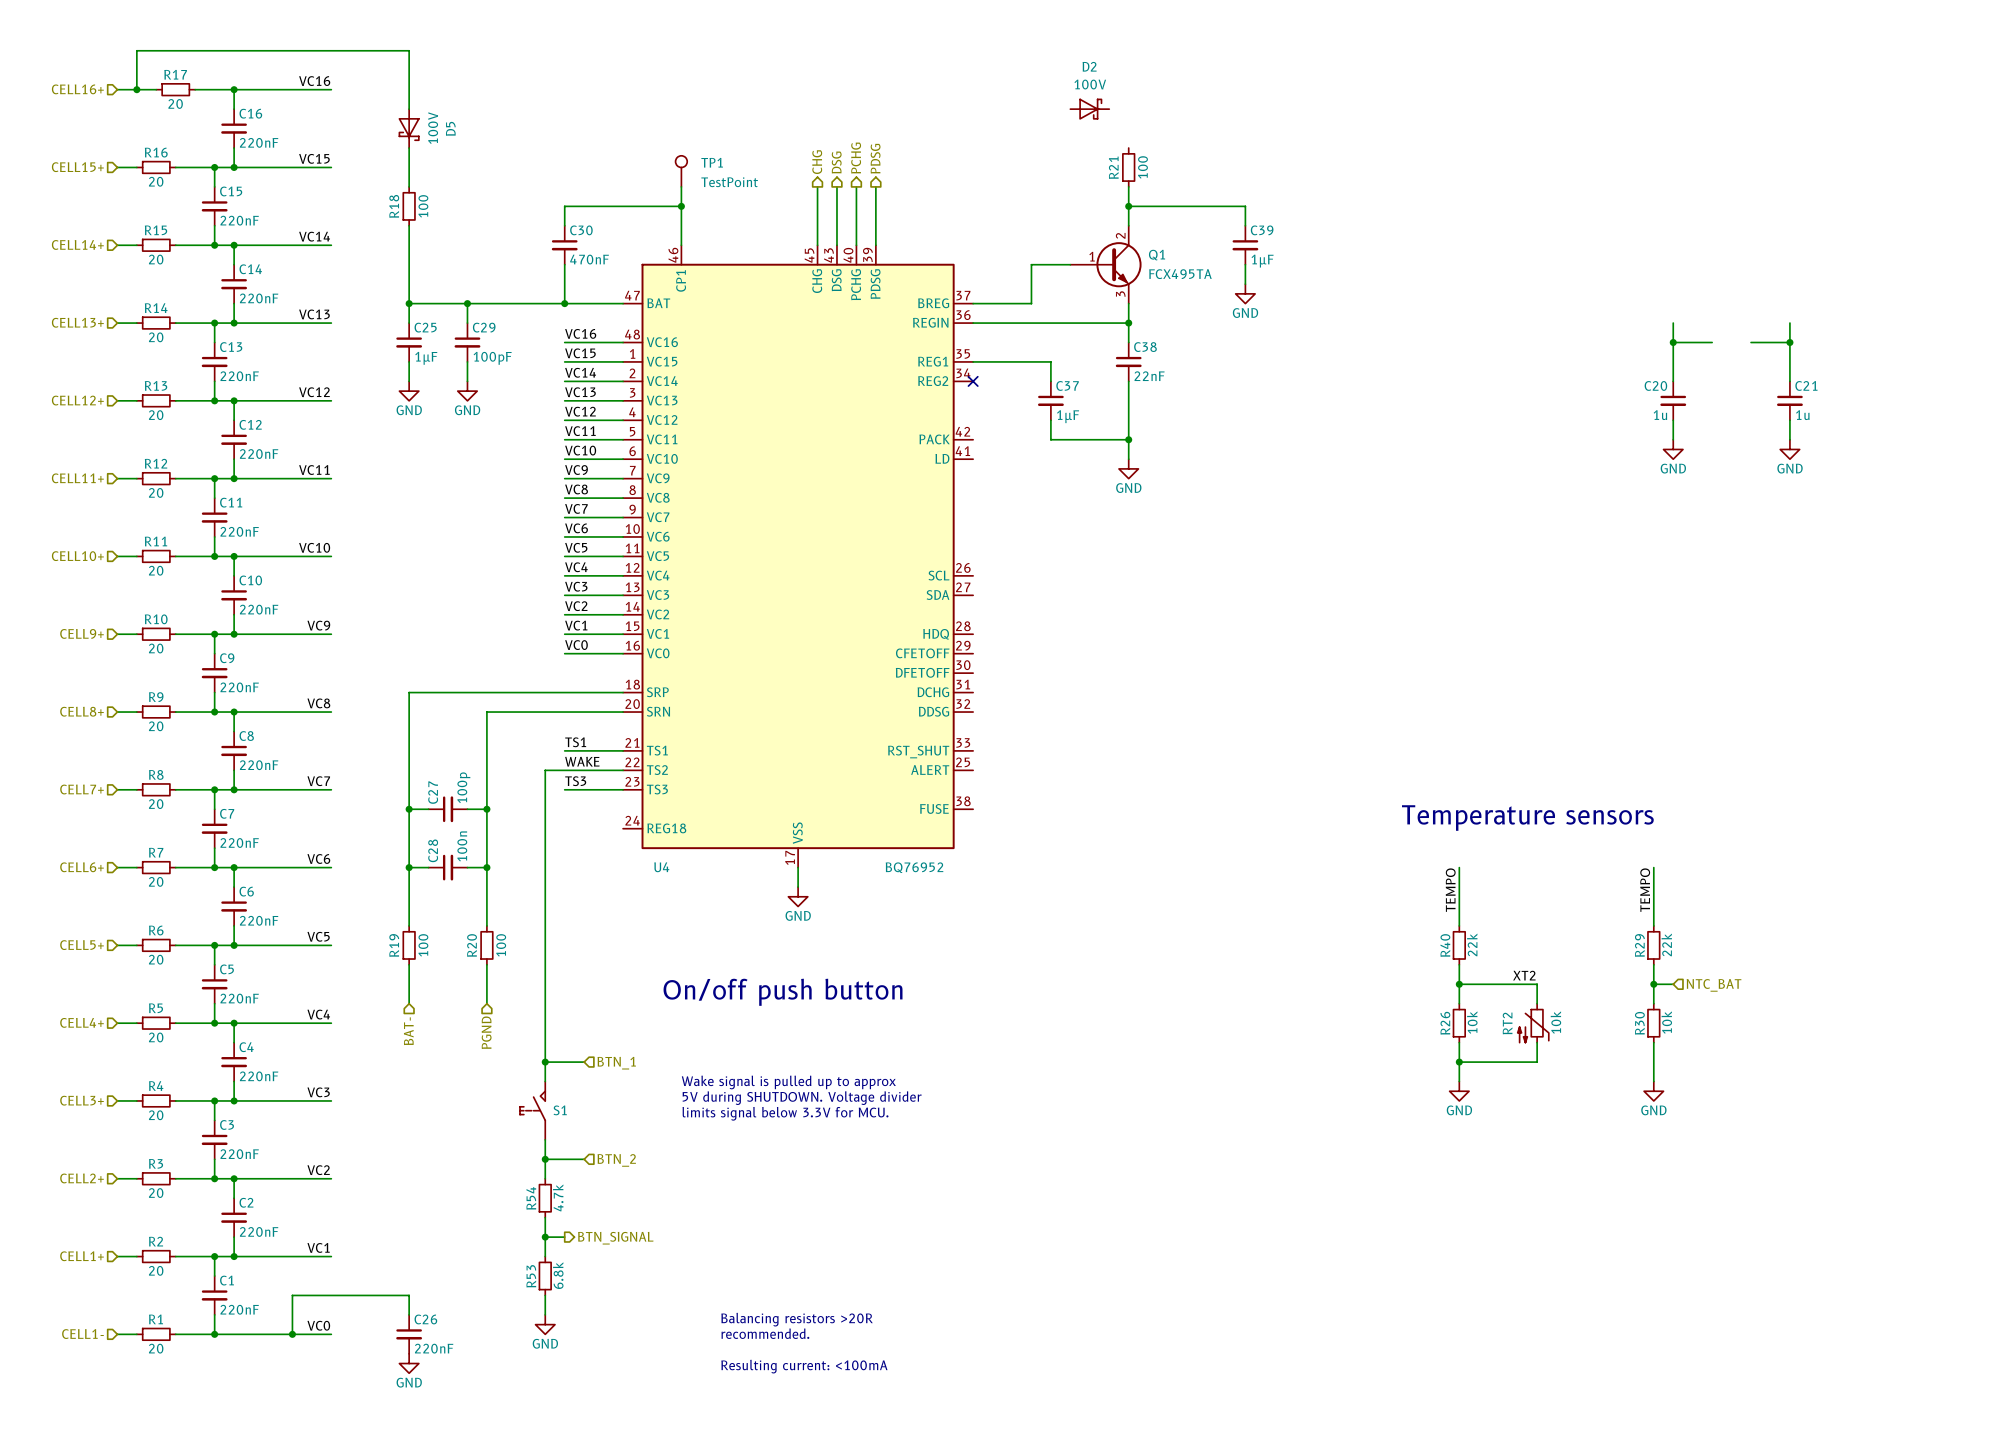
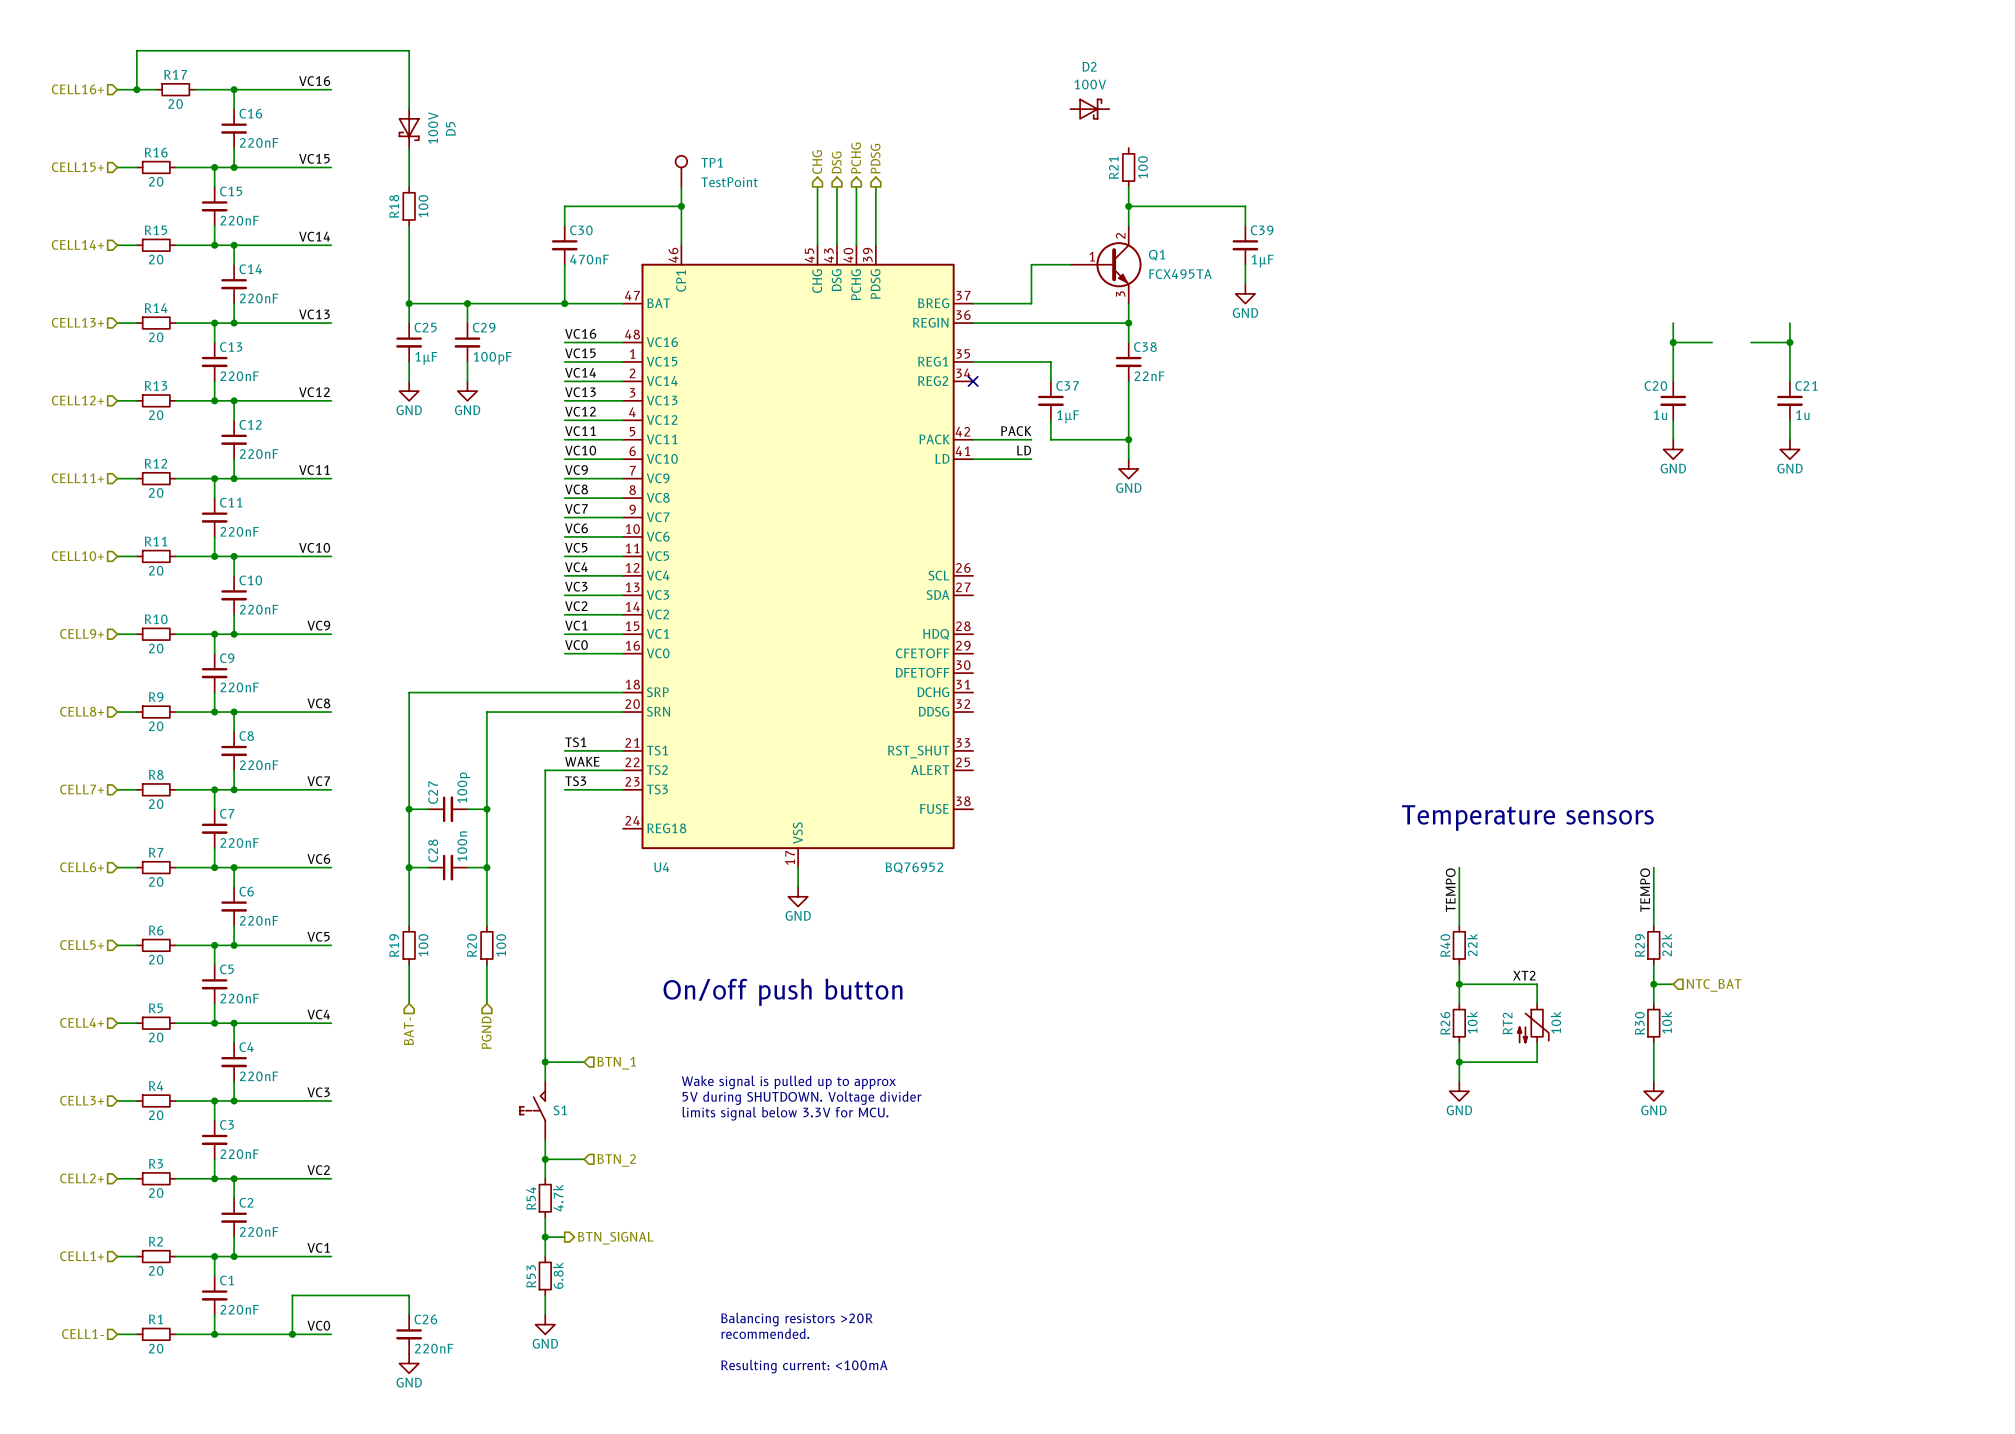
label: none -> PACK (1016, 431)
wire: none -> (973, 439) (1031, 439)
label: none -> LD (1024, 450)
wire: none -> (973, 459) (1031, 459)

